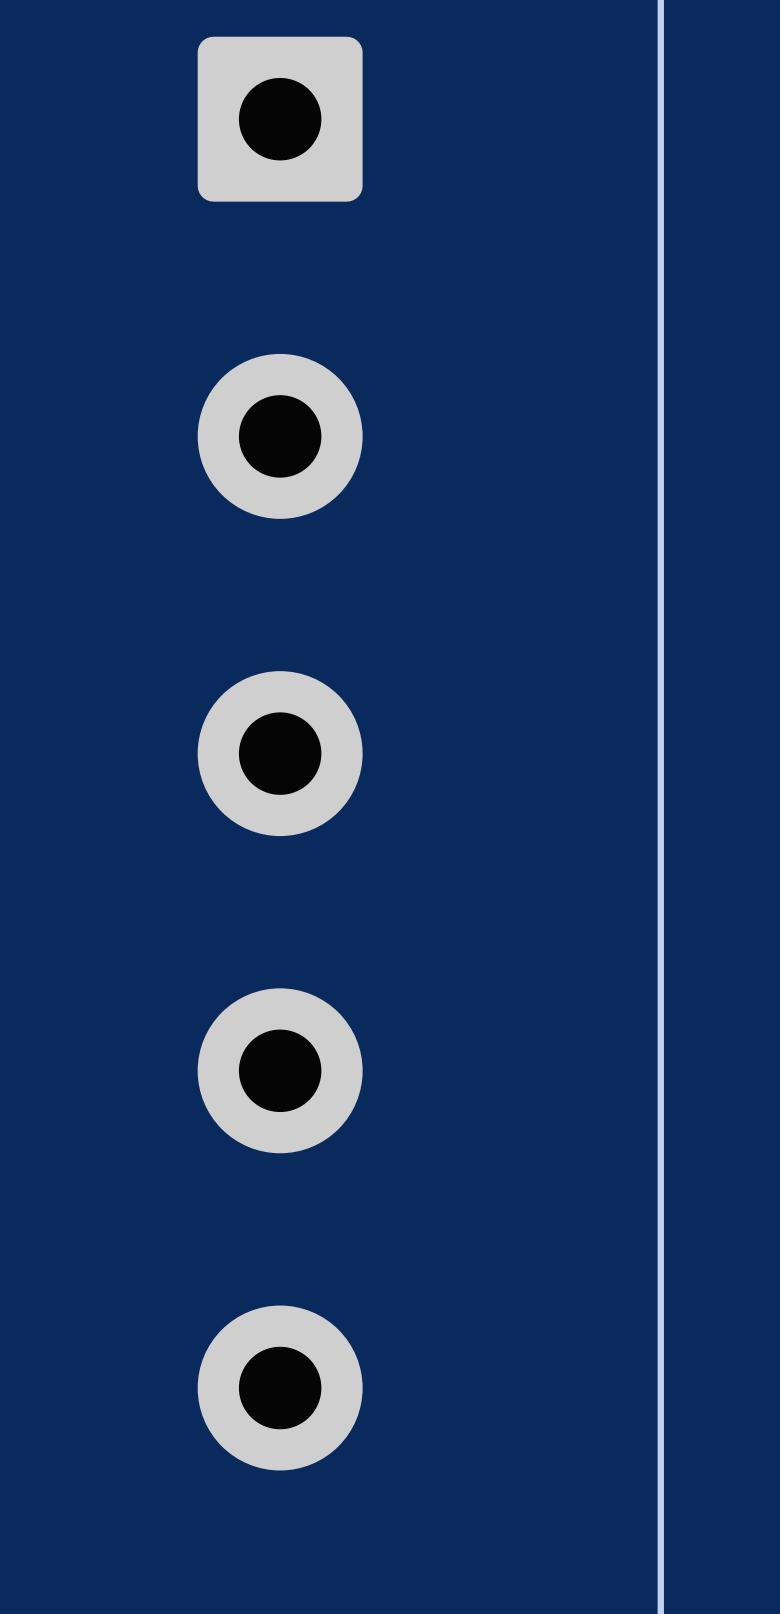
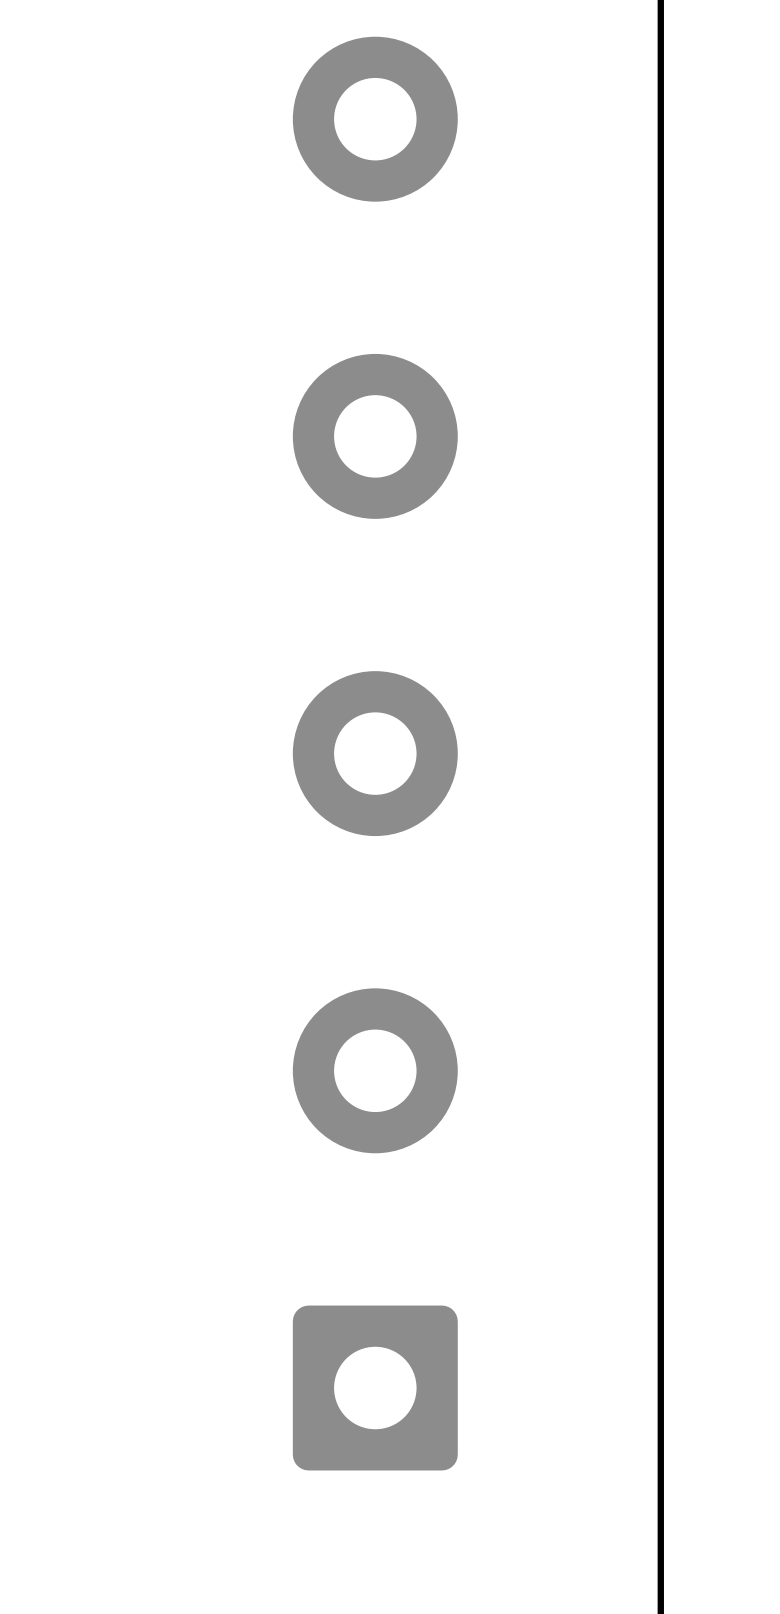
part rotation: 0° (280, 753) -> 180° (375, 753)

